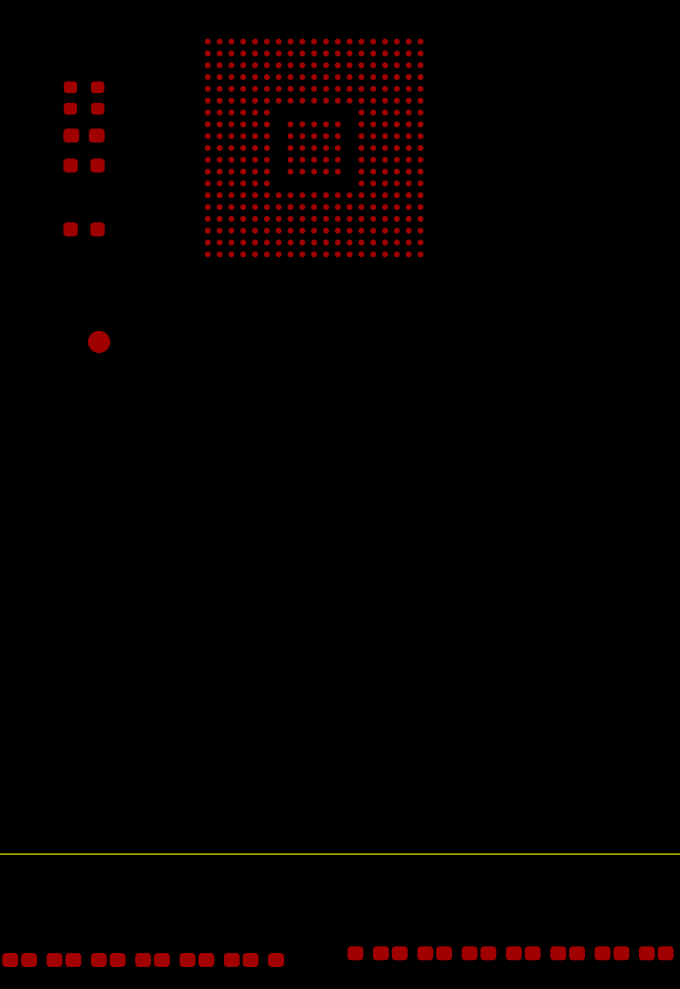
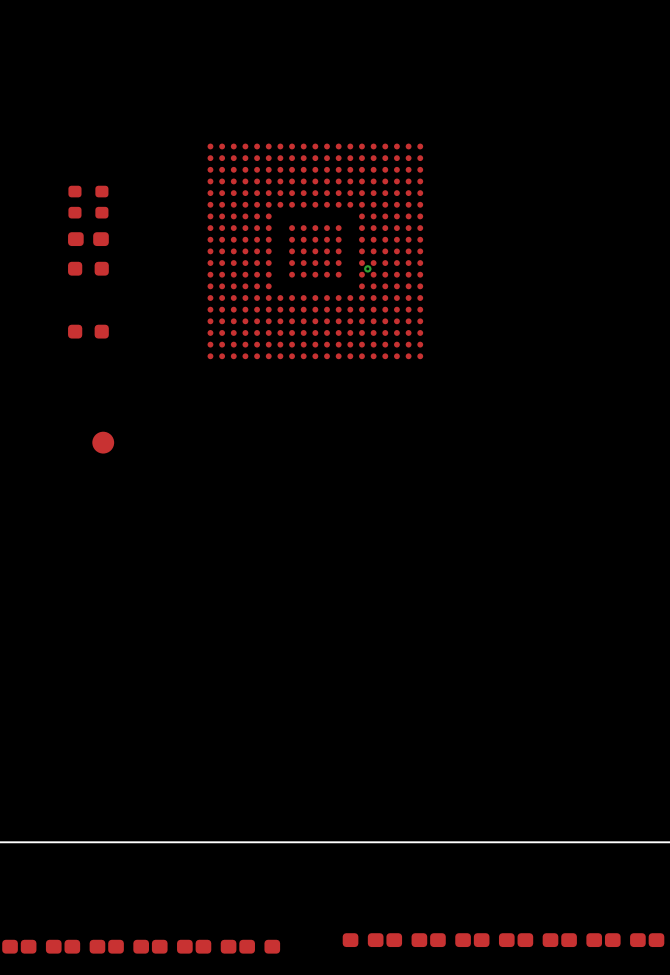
part position: (84, 98) -> (88, 202)
part position: (84, 135) -> (88, 239)
part position: (314, 147) -> (315, 251)
part: (84, 165) -> none
part position: (84, 229) -> (88, 268)
via: none -> (367, 268)
part footprint: [87, 330, 111, 353] -> [68, 324, 109, 339]
part: none -> (103, 442)

